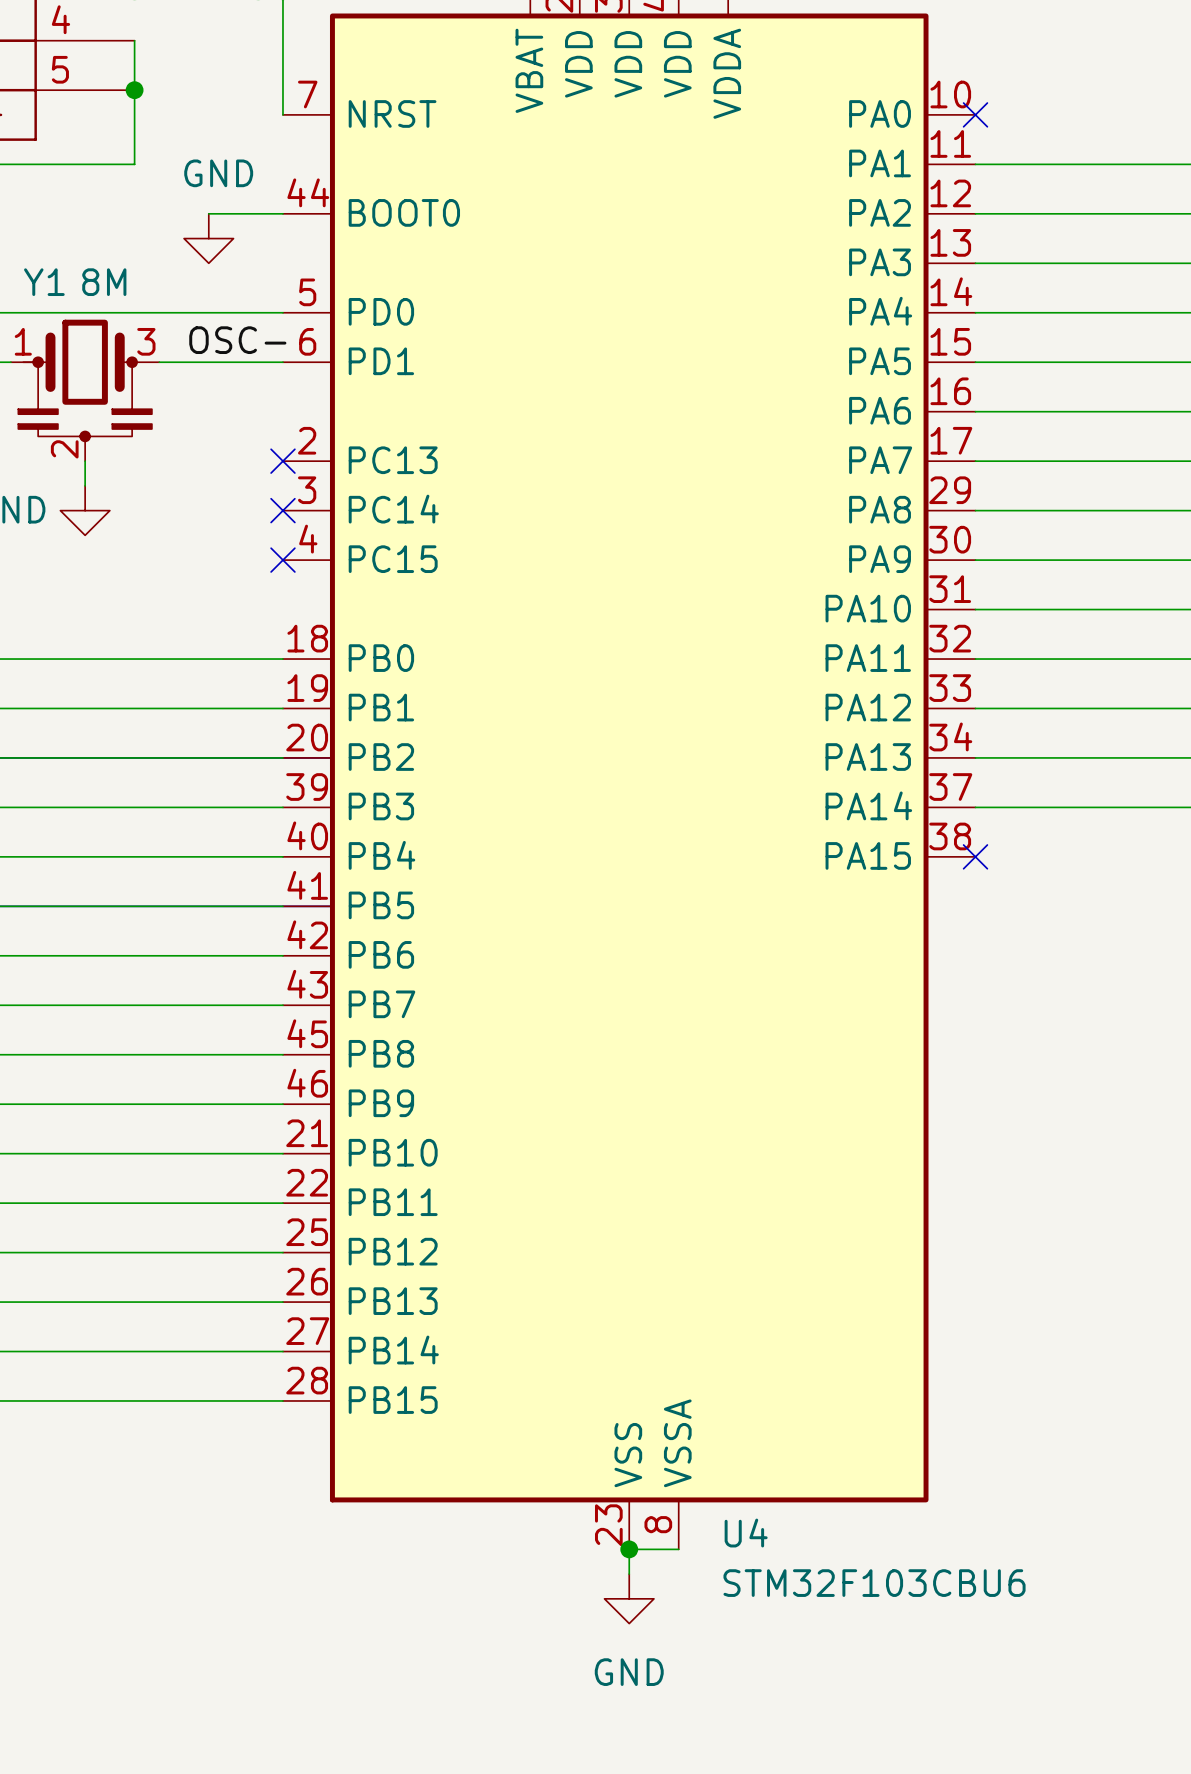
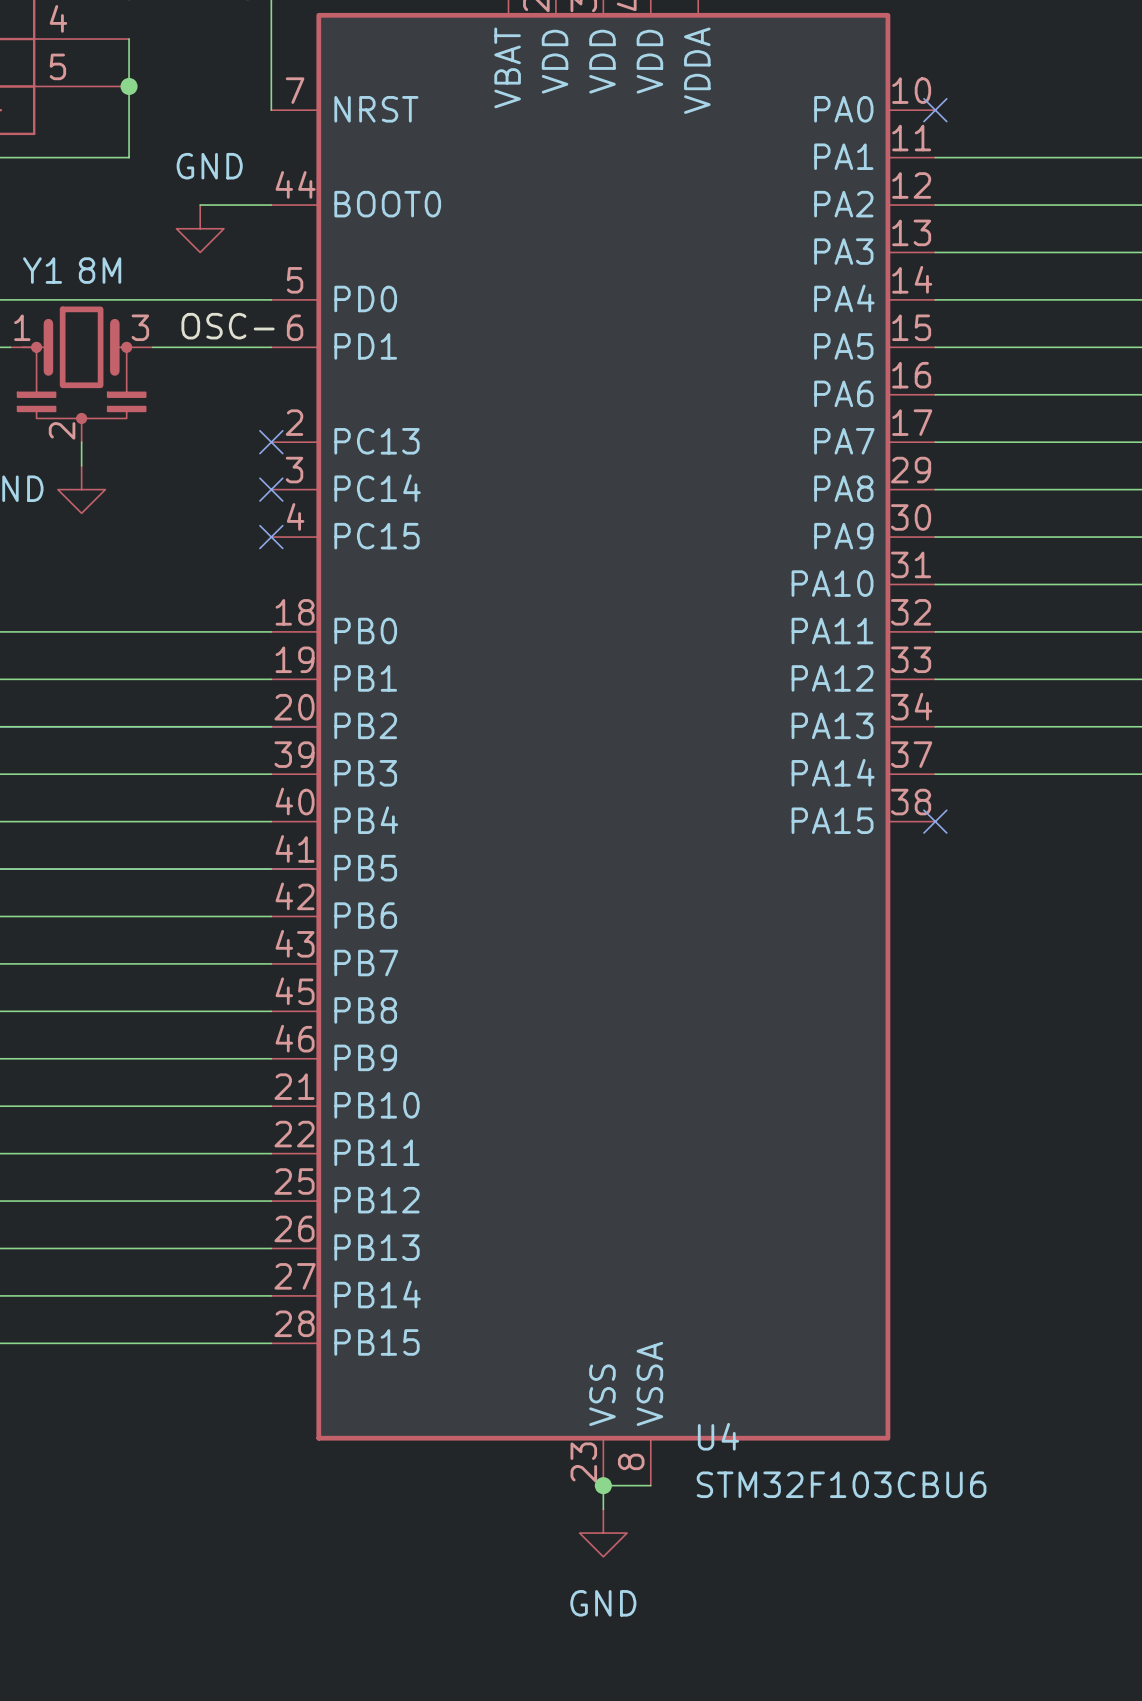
U4 name position: U4 (746, 1533) -> U4 (718, 1436)
U4 value position: STM32F103CBU6 (874, 1583) -> STM32F103CBU6 (841, 1484)

